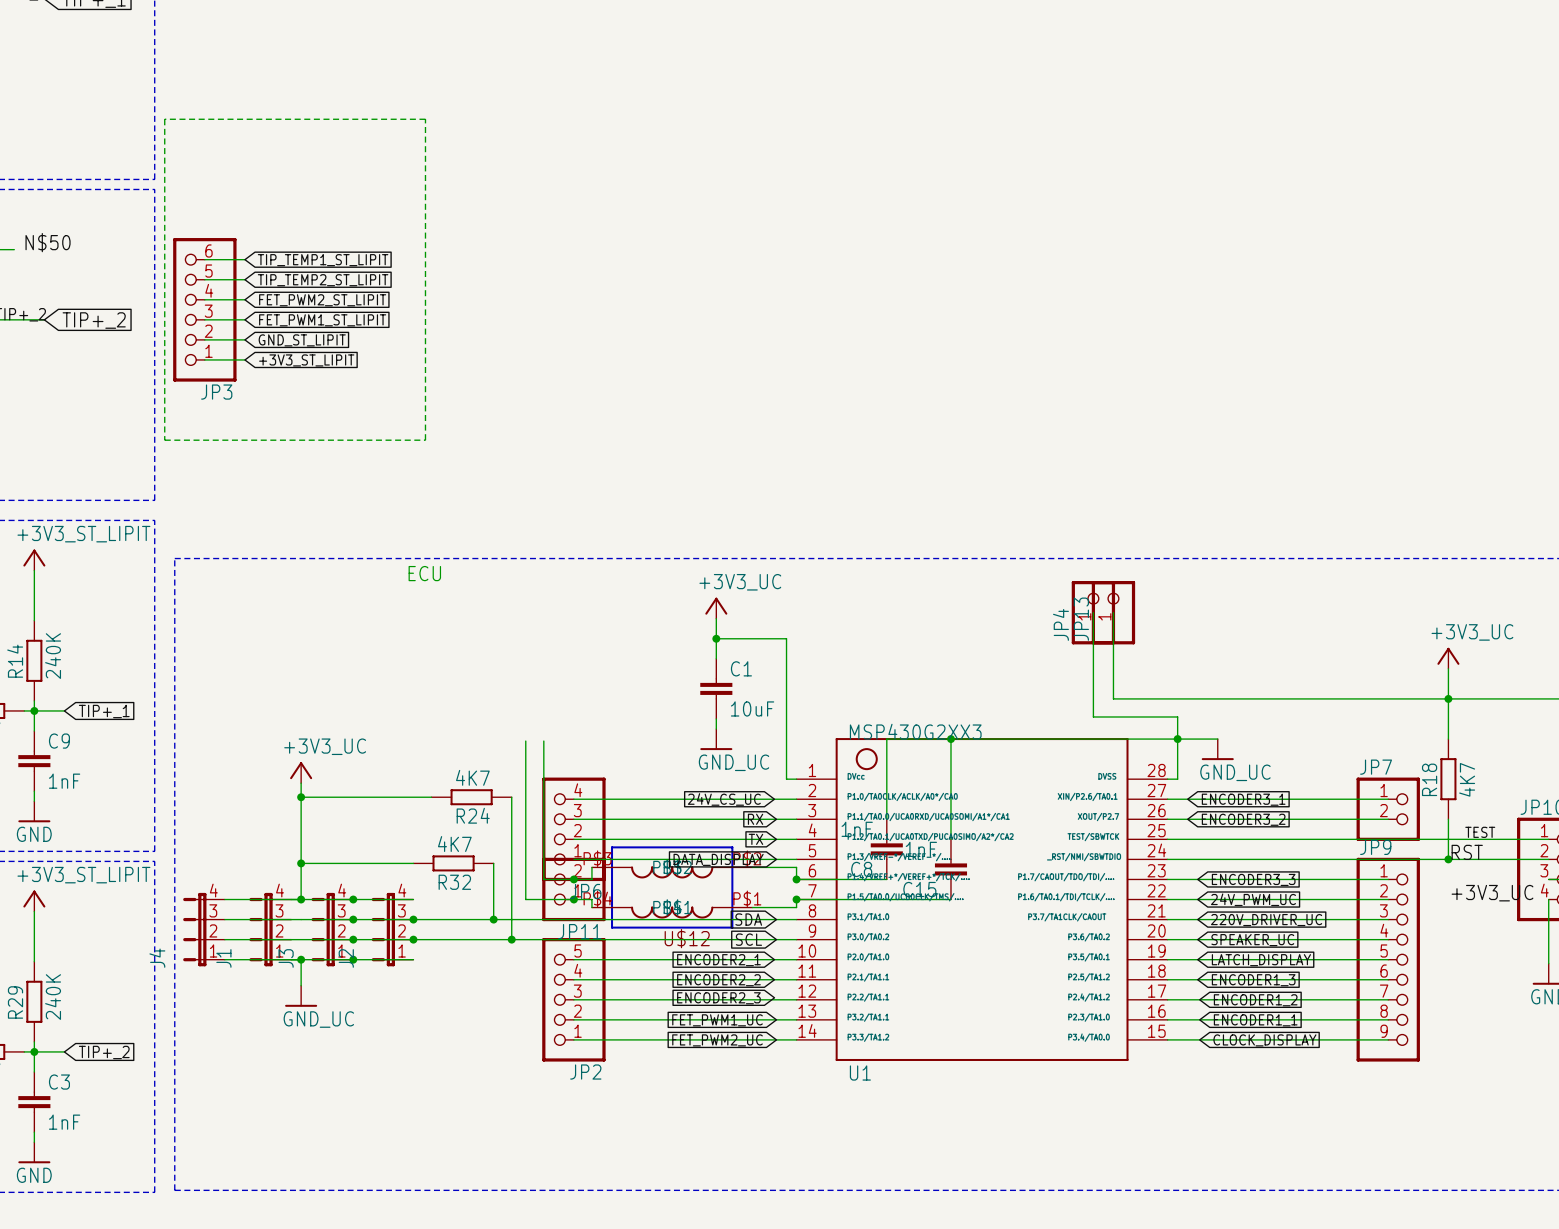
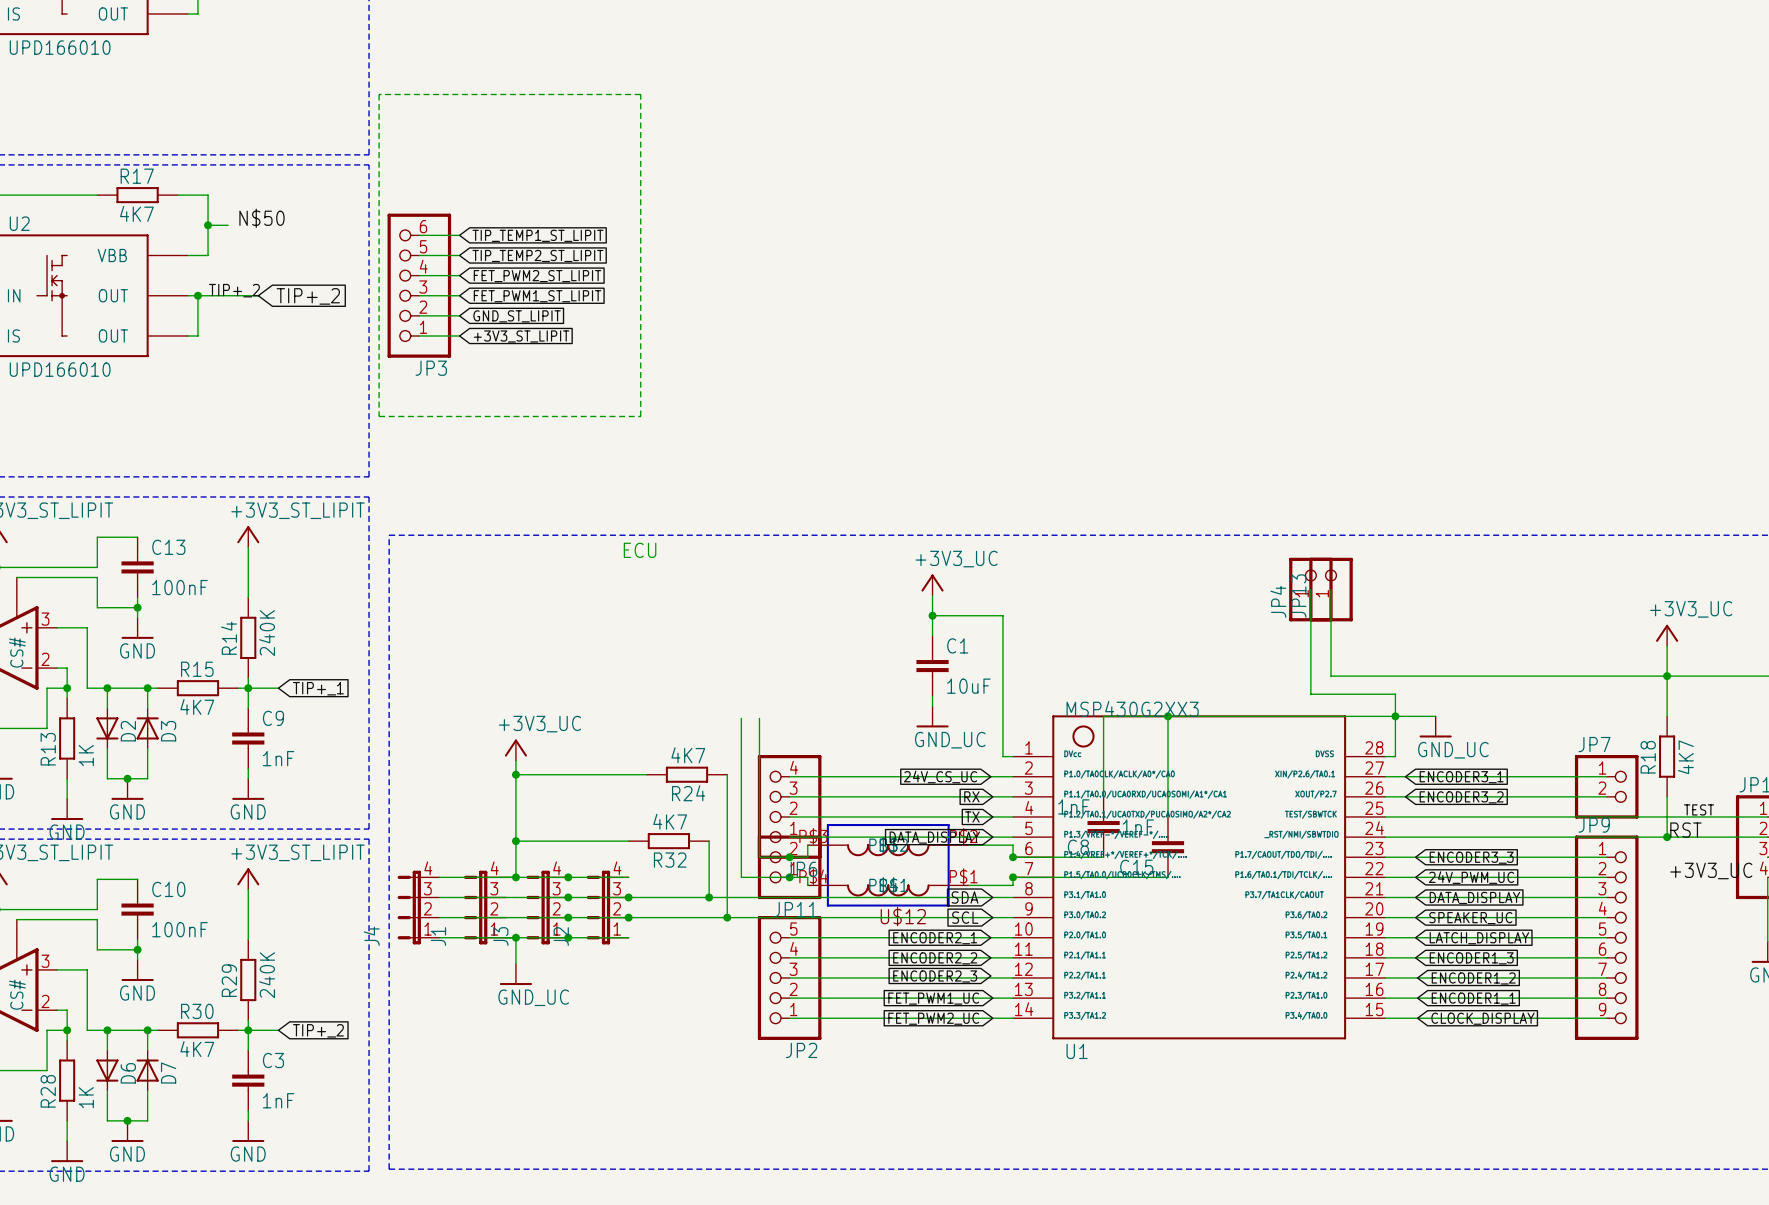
global label: 220V_DRIVER_UC (1266, 920) -> DATA_DISPLAY (1474, 897)

